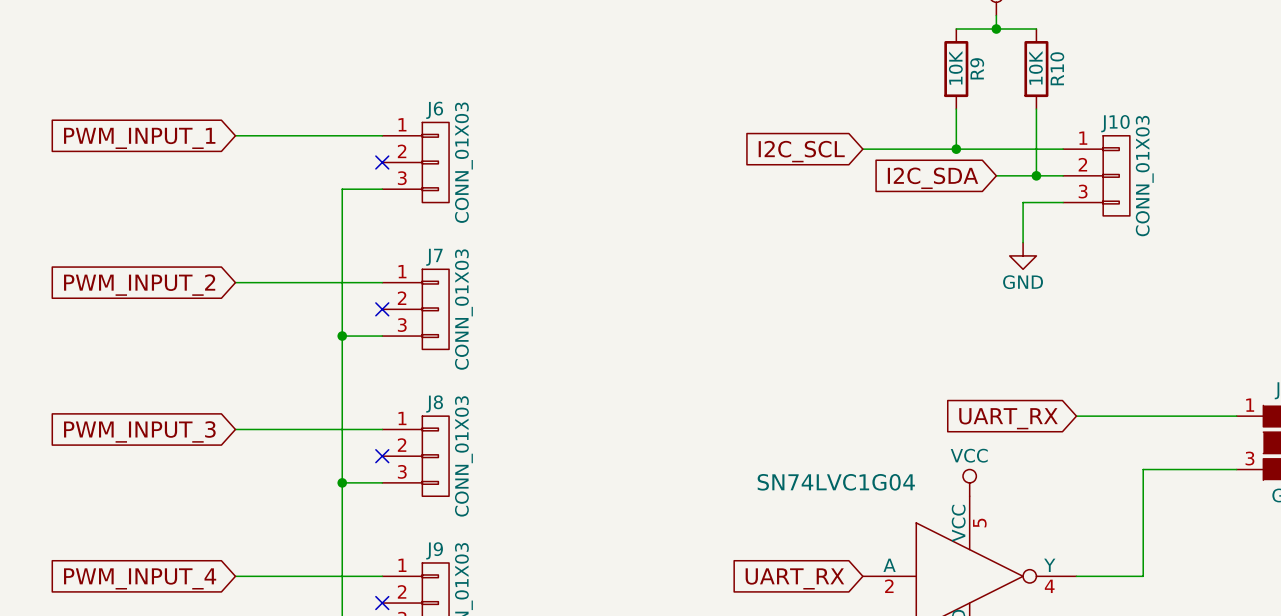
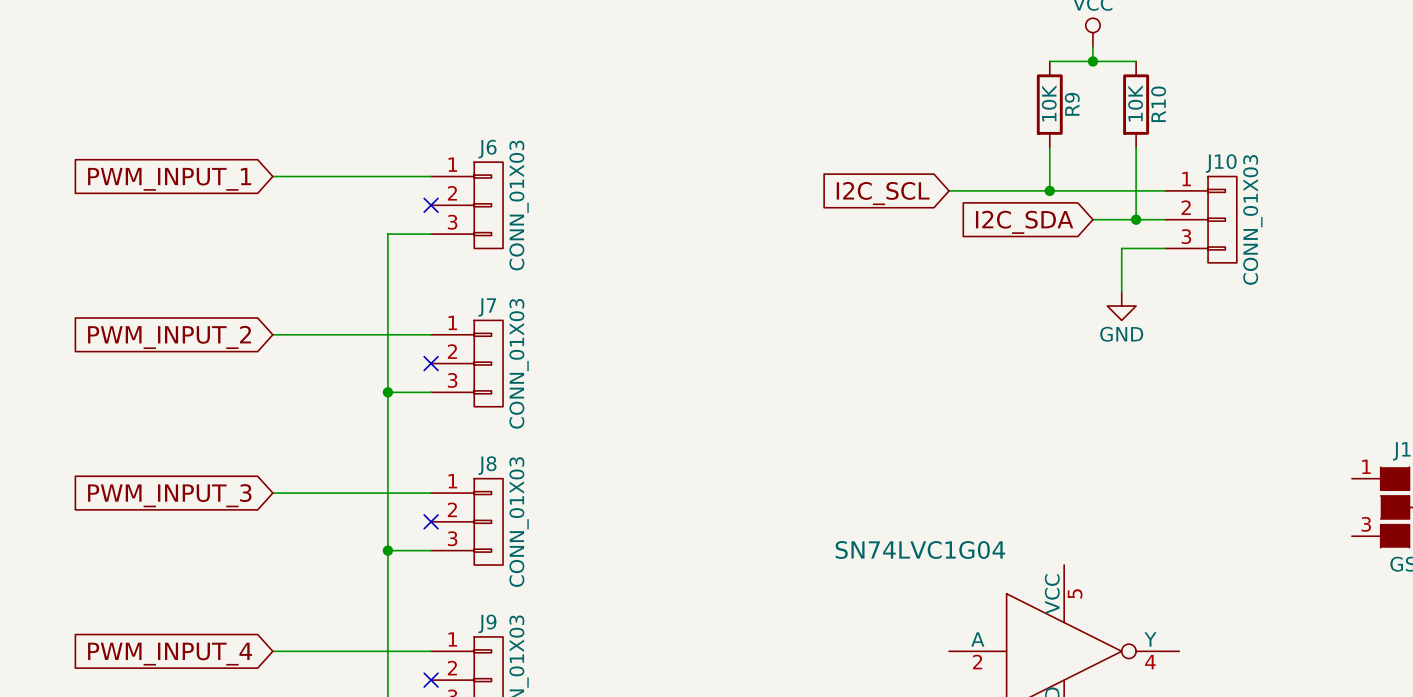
wire: (1076, 416) (1236, 416) -> none
global label: UART_RX (1008, 418) -> none
wire: (1236, 469) (1143, 469) (1143, 576) (1076, 576) -> none
power symbol: VCC (969, 482) -> none
global label: UART_RX (794, 578) -> none

